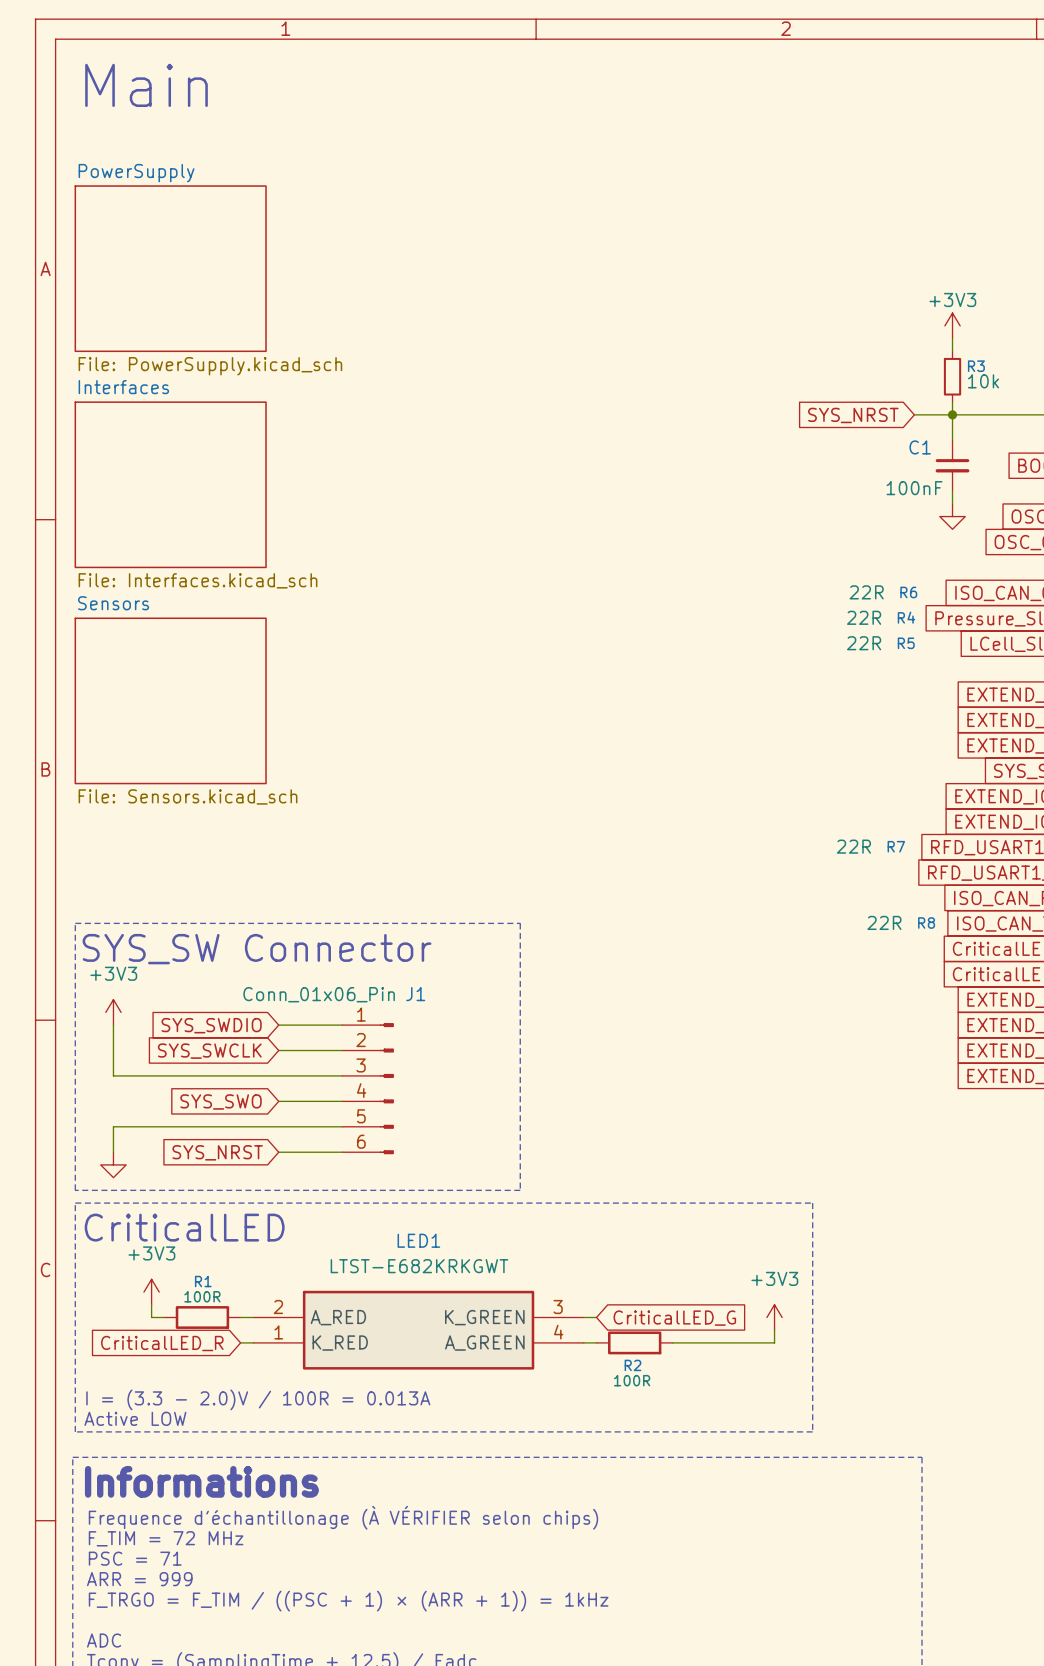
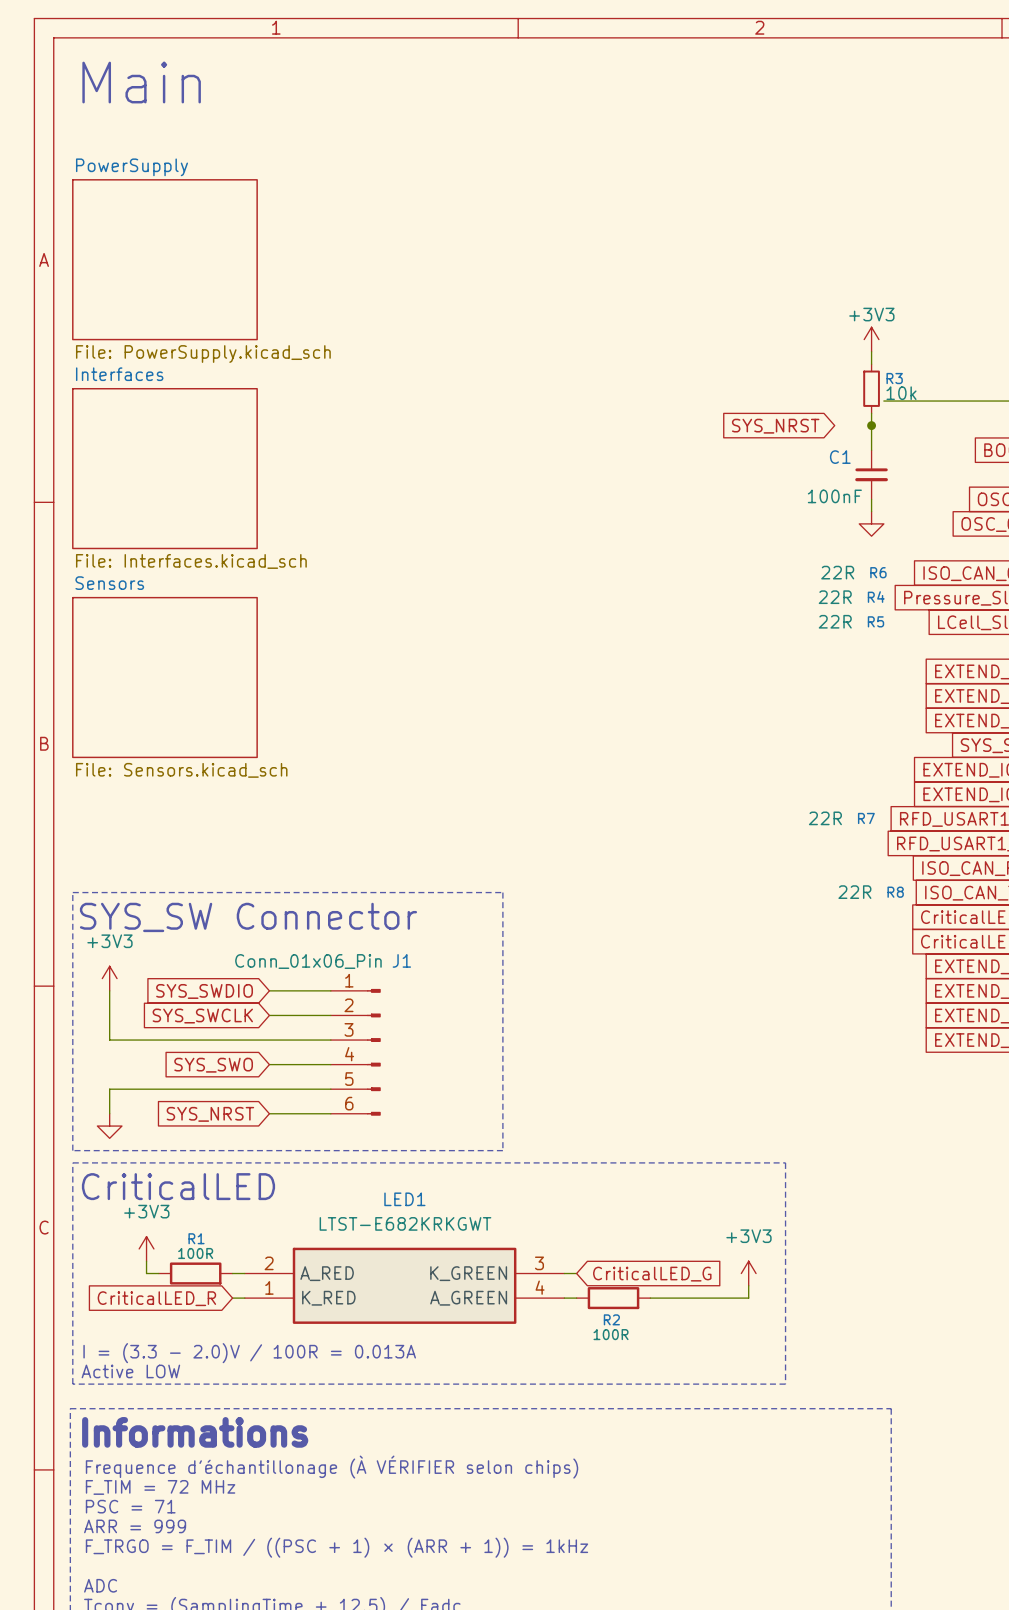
power symbol position: +3V3 (952, 325) -> +3V3 (871, 339)
wire: (952, 338) (952, 351) -> (871, 351) (871, 364)
R3 position: (952, 376) -> (871, 388)
wire: (952, 402) (952, 440) -> (871, 413) (871, 450)
junction position: (952, 414) -> (871, 425)
global label position: SYS_NRST (853, 415) -> SYS_NRST (775, 426)
C1 position: (952, 465) -> (871, 474)
wire: (952, 491) (952, 503) -> (871, 499) (871, 511)
power symbol position: (952, 516) -> (871, 523)

